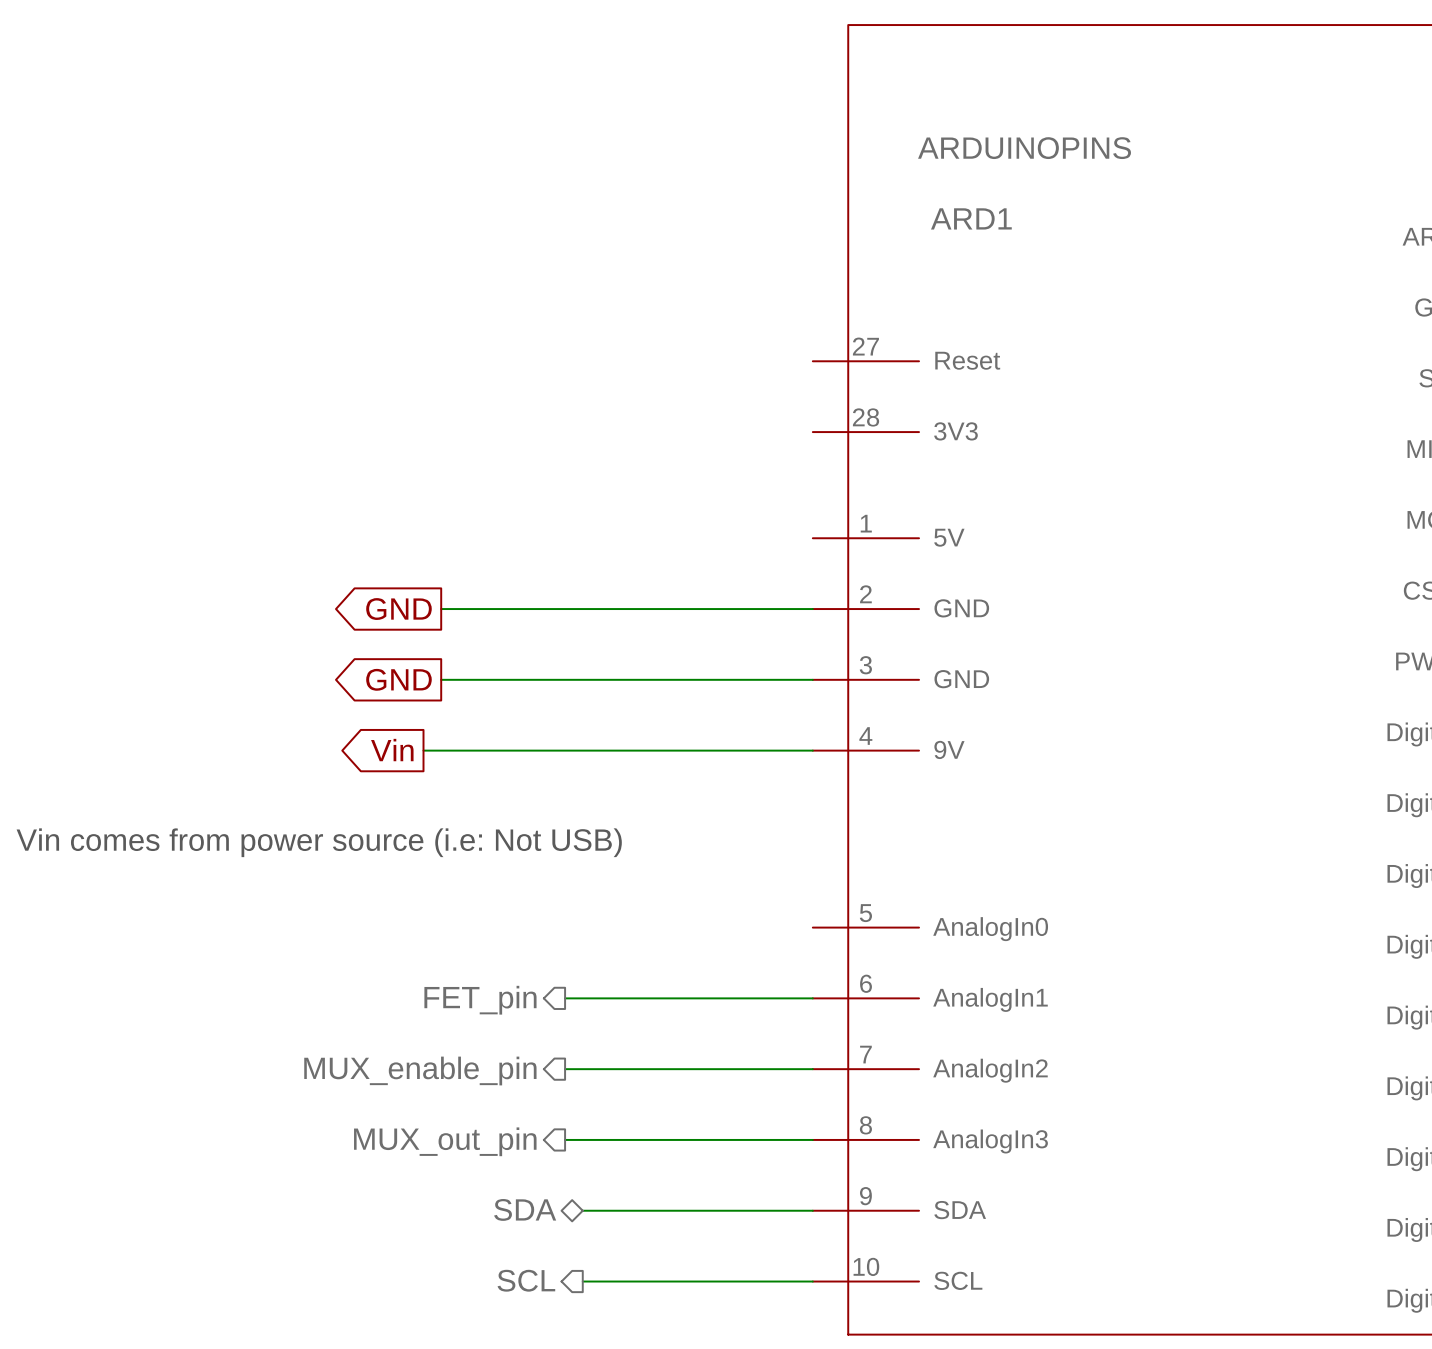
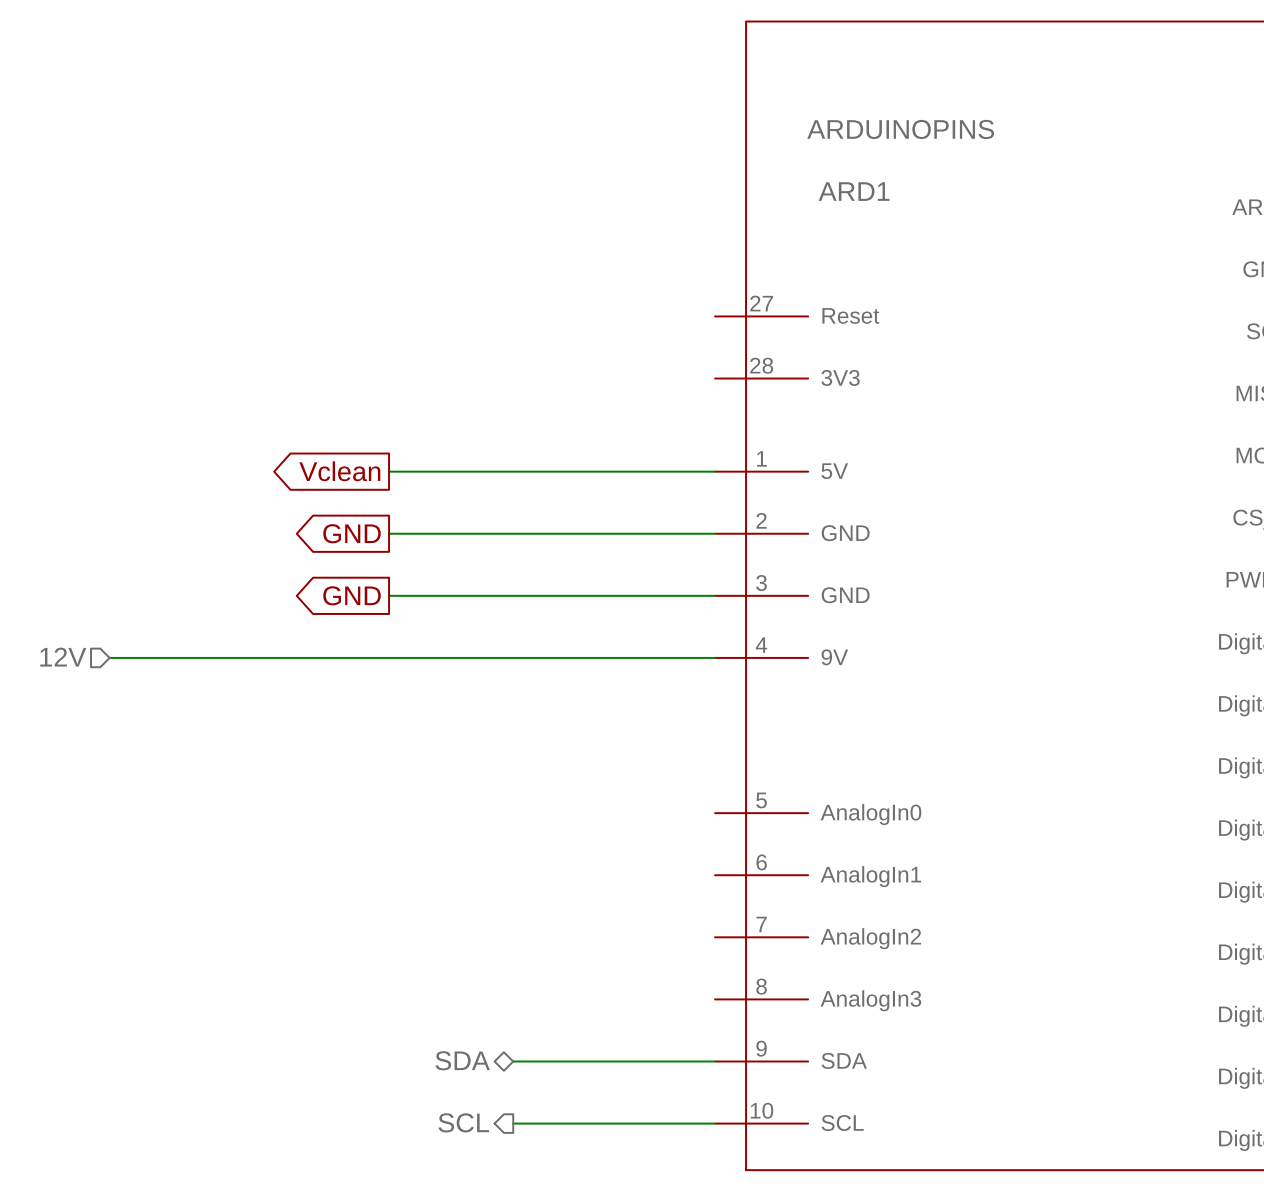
global label: none -> Vclean (339, 471)
wire: none -> (389, 471) (715, 471)
hierarchical label: none -> 12V (63, 657)
wire: none -> (109, 657) (373, 657)
global label: Vin (392, 750) -> none
text: Vin comes from power source (i.e: Not USB) (319, 842) -> none
wire: (565, 998) (812, 998) -> none
hierarchical label: FET_pin (480, 1000) -> none
wire: (565, 1069) (812, 1069) -> none
hierarchical label: MUX_enable_pin (420, 1071) -> none
wire: (565, 1139) (812, 1139) -> none
hierarchical label: MUX_out_pin (445, 1141) -> none

